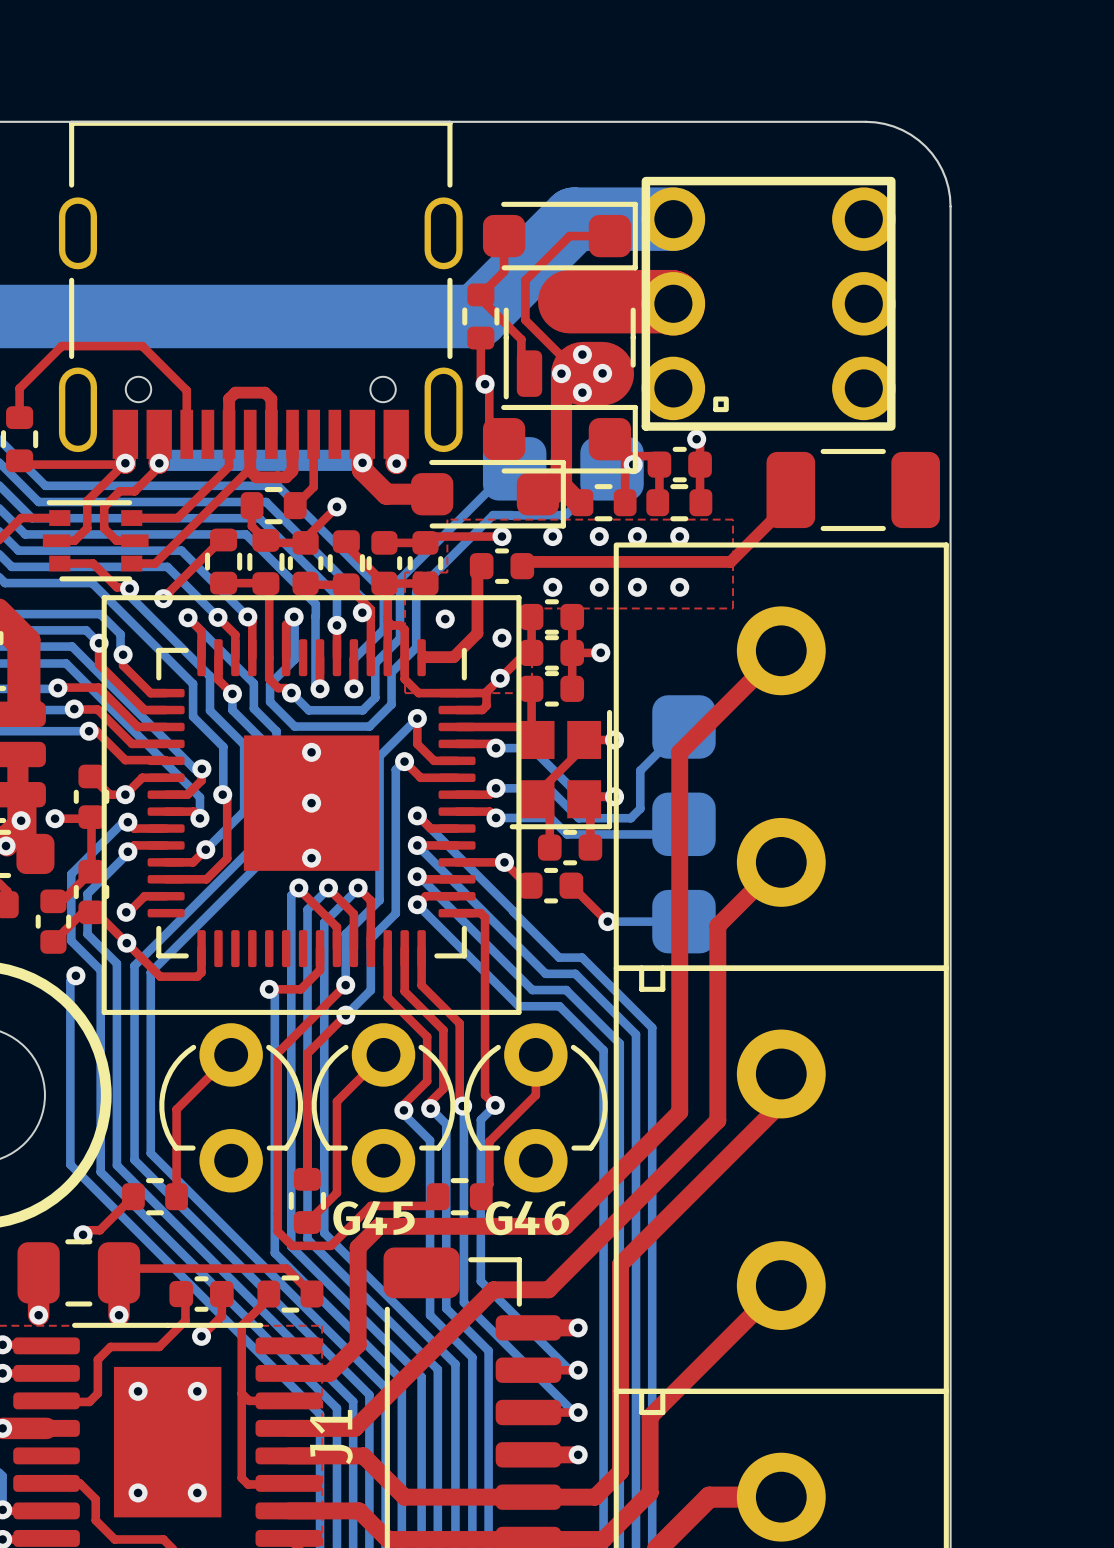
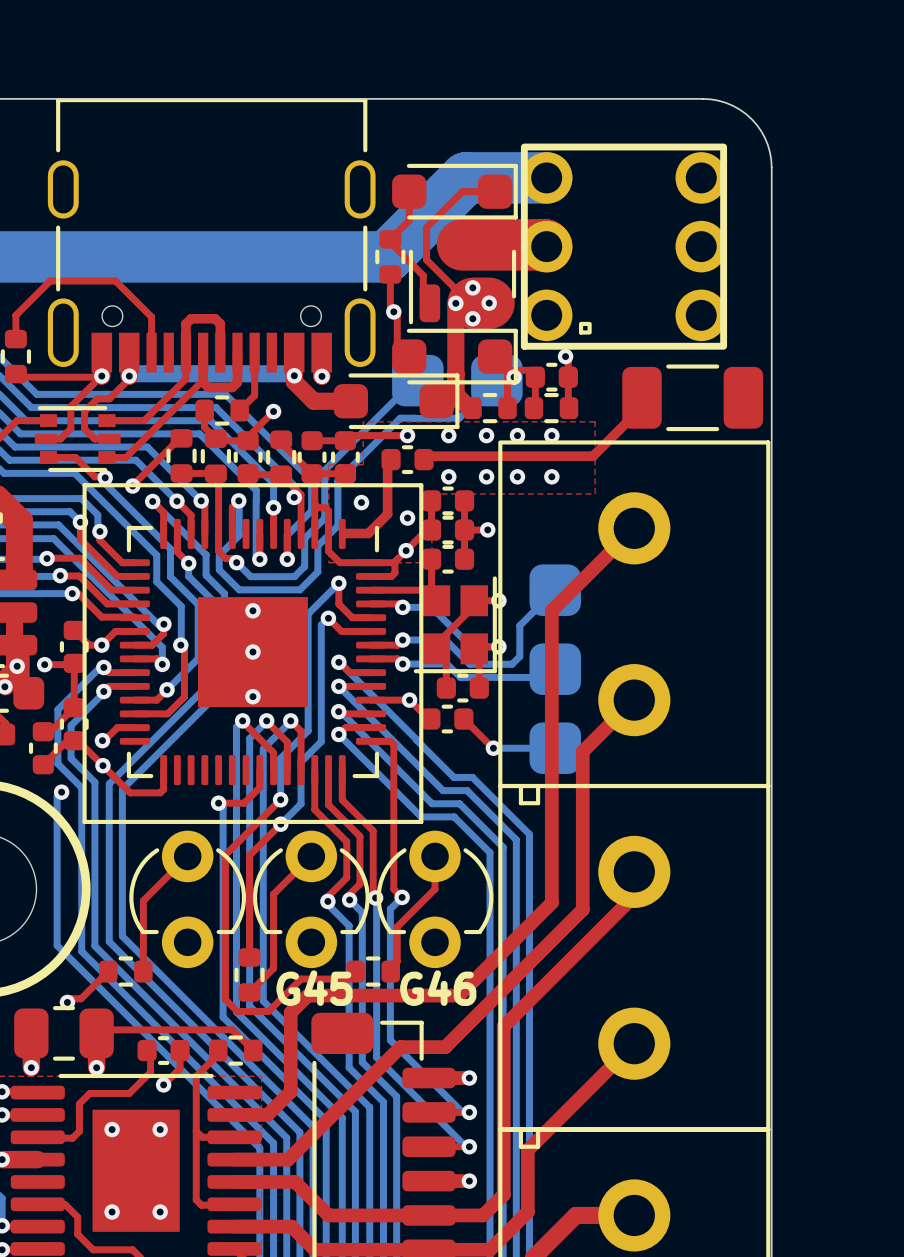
J1 name: J1 (331, 1437) -> none

